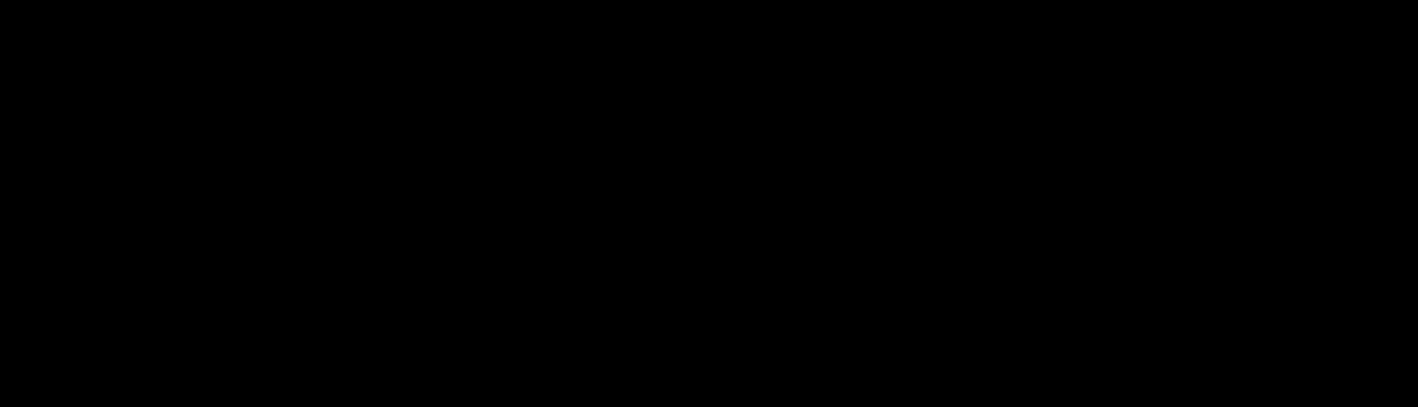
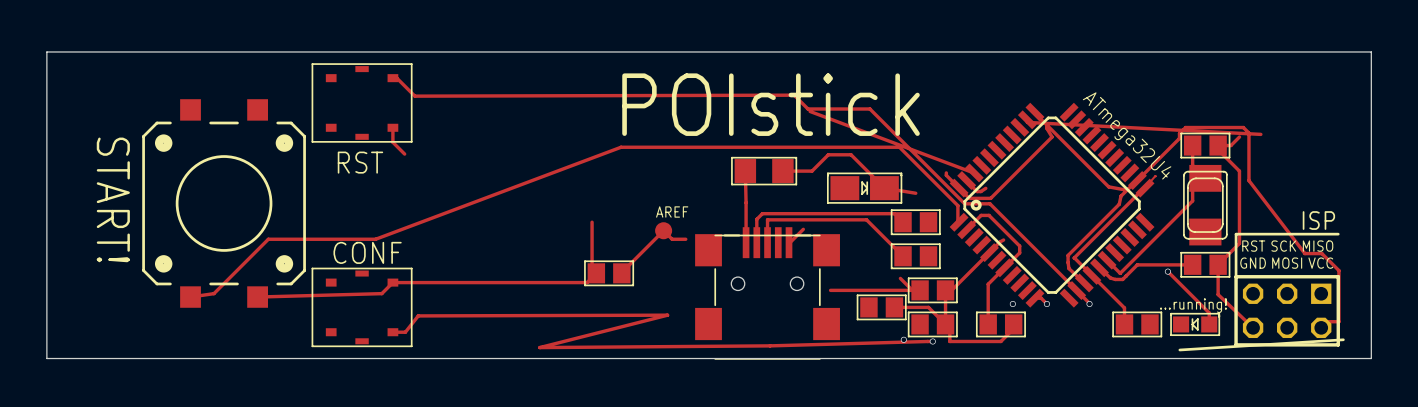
board edge: none -> (46, 51) (1371, 51) (1371, 358) (46, 358) (46, 51)
track: none -> (392, 78) (396, 78) (414, 96) (794, 95) (807, 109) (869, 109) (964, 203) (989, 203) (1089, 304)
part: none -> (362, 102)
text: none -> POIstick (771, 104)
track: none -> (810, 111) (974, 172)
track: none -> (1034, 112) (1108, 186) (1126, 190)
track: none -> (1027, 119) (1027, 122) (1260, 134)
track: none -> (1046, 125) (1052, 137) (990, 198) (969, 198) (946, 175) (946, 172)
track: none -> (392, 127) (392, 142) (404, 154)
text: none -> ATmega32U4 (1127, 135)
track: none -> (1239, 137) (1230, 145) (1218, 145) (1218, 149) (1239, 171) (1239, 243) (1218, 264) (1218, 294) (1253, 327)
track: none -> (1192, 145) (1192, 200) (1120, 273) (1107, 260)
part: none -> (1205, 145)
text: none -> RST (360, 162)
track: none -> (745, 171) (746, 242)
part: none -> (764, 171)
track: none -> (782, 171) (812, 171) (828, 154) (851, 154) (884, 188) (915, 193)
track: none -> (1155, 176) (1074, 258) (1124, 307) (1124, 324)
track: none -> (966, 180) (977, 191) (985, 188)
part: none -> (864, 188)
text: none -> START! (113, 199)
part: none -> (224, 203)
part: none -> (1052, 205)
part: none -> (1205, 205)
track: none -> (592, 222) (592, 269) (596, 273) (587, 282) (392, 282) (381, 293) (257, 297)
track: none -> (903, 222) (894, 213) (762, 213) (756, 219) (756, 242)
part: none -> (915, 222)
track: none -> (959, 222) (957, 205) (899, 147) (621, 147) (375, 239) (268, 239) (213, 293) (190, 297)
track: none -> (803, 229) (789, 242)
track: none -> (966, 229) (981, 215) (989, 215) (1019, 246) (1019, 252) (1004, 267)
AREF: none -> (663, 230)
line: none -> (1338, 234) (1236, 234) (1236, 276)
track: none -> (685, 239) (672, 239) (663, 230) (621, 273)
track: none -> (1003, 240) (951, 290) (945, 290) (945, 324)
track: none -> (767, 242) (767, 219) (866, 219) (903, 256)
text: none -> RST (1253, 246)
text: none -> SCK (1283, 246)
text: none -> MISO (1318, 246)
text: none -> CONF (367, 252)
part: none -> (915, 256)
text: none -> GND (1253, 263)
text: none -> MOSI (1287, 263)
text: none -> VCC (1320, 263)
track: none -> (1192, 264) (1137, 264) (1122, 279) (1110, 278) (1099, 267)
part: none -> (1205, 264)
track: none -> (1004, 267) (988, 284) (988, 324)
track: none -> (1167, 271) (1209, 312) (1209, 324)
via: none -> (1167, 271)
part: none -> (609, 273)
track: none -> (900, 278) (912, 290)
track: none -> (1084, 282) (1068, 268) (1068, 255) (1119, 204) (1120, 196) (1179, 138) (1179, 133) (1185, 127) (1243, 127) (1248, 133) (1248, 180) (1304, 253) (1321, 253) (1338, 270) (1338, 321) (1327, 321) (1321, 327)
track: none -> (830, 290) (920, 290)
part: none -> (932, 290)
part: none -> (767, 293)
track: none -> (1034, 298) (1041, 298) (1046, 304)
via: none -> (1012, 304)
via: none -> (1046, 304)
via: none -> (1089, 304)
text: none -> ...running! (1193, 305)
part: none -> (362, 307)
part: none -> (881, 307)
track: none -> (894, 307) (928, 307) (949, 328) (949, 341) (1000, 341) (1013, 328) (1013, 324)
ISP: none -> (1287, 310)
part: none -> (932, 324)
part: none -> (1000, 324)
part: none -> (1137, 324)
part: none -> (1195, 324)
track: none -> (392, 332) (405, 332) (418, 315) (667, 315) (539, 347) (770, 345) (932, 341)
via: none -> (903, 339)
line: none -> (1343, 339) (1179, 350)
via: none -> (932, 341)

